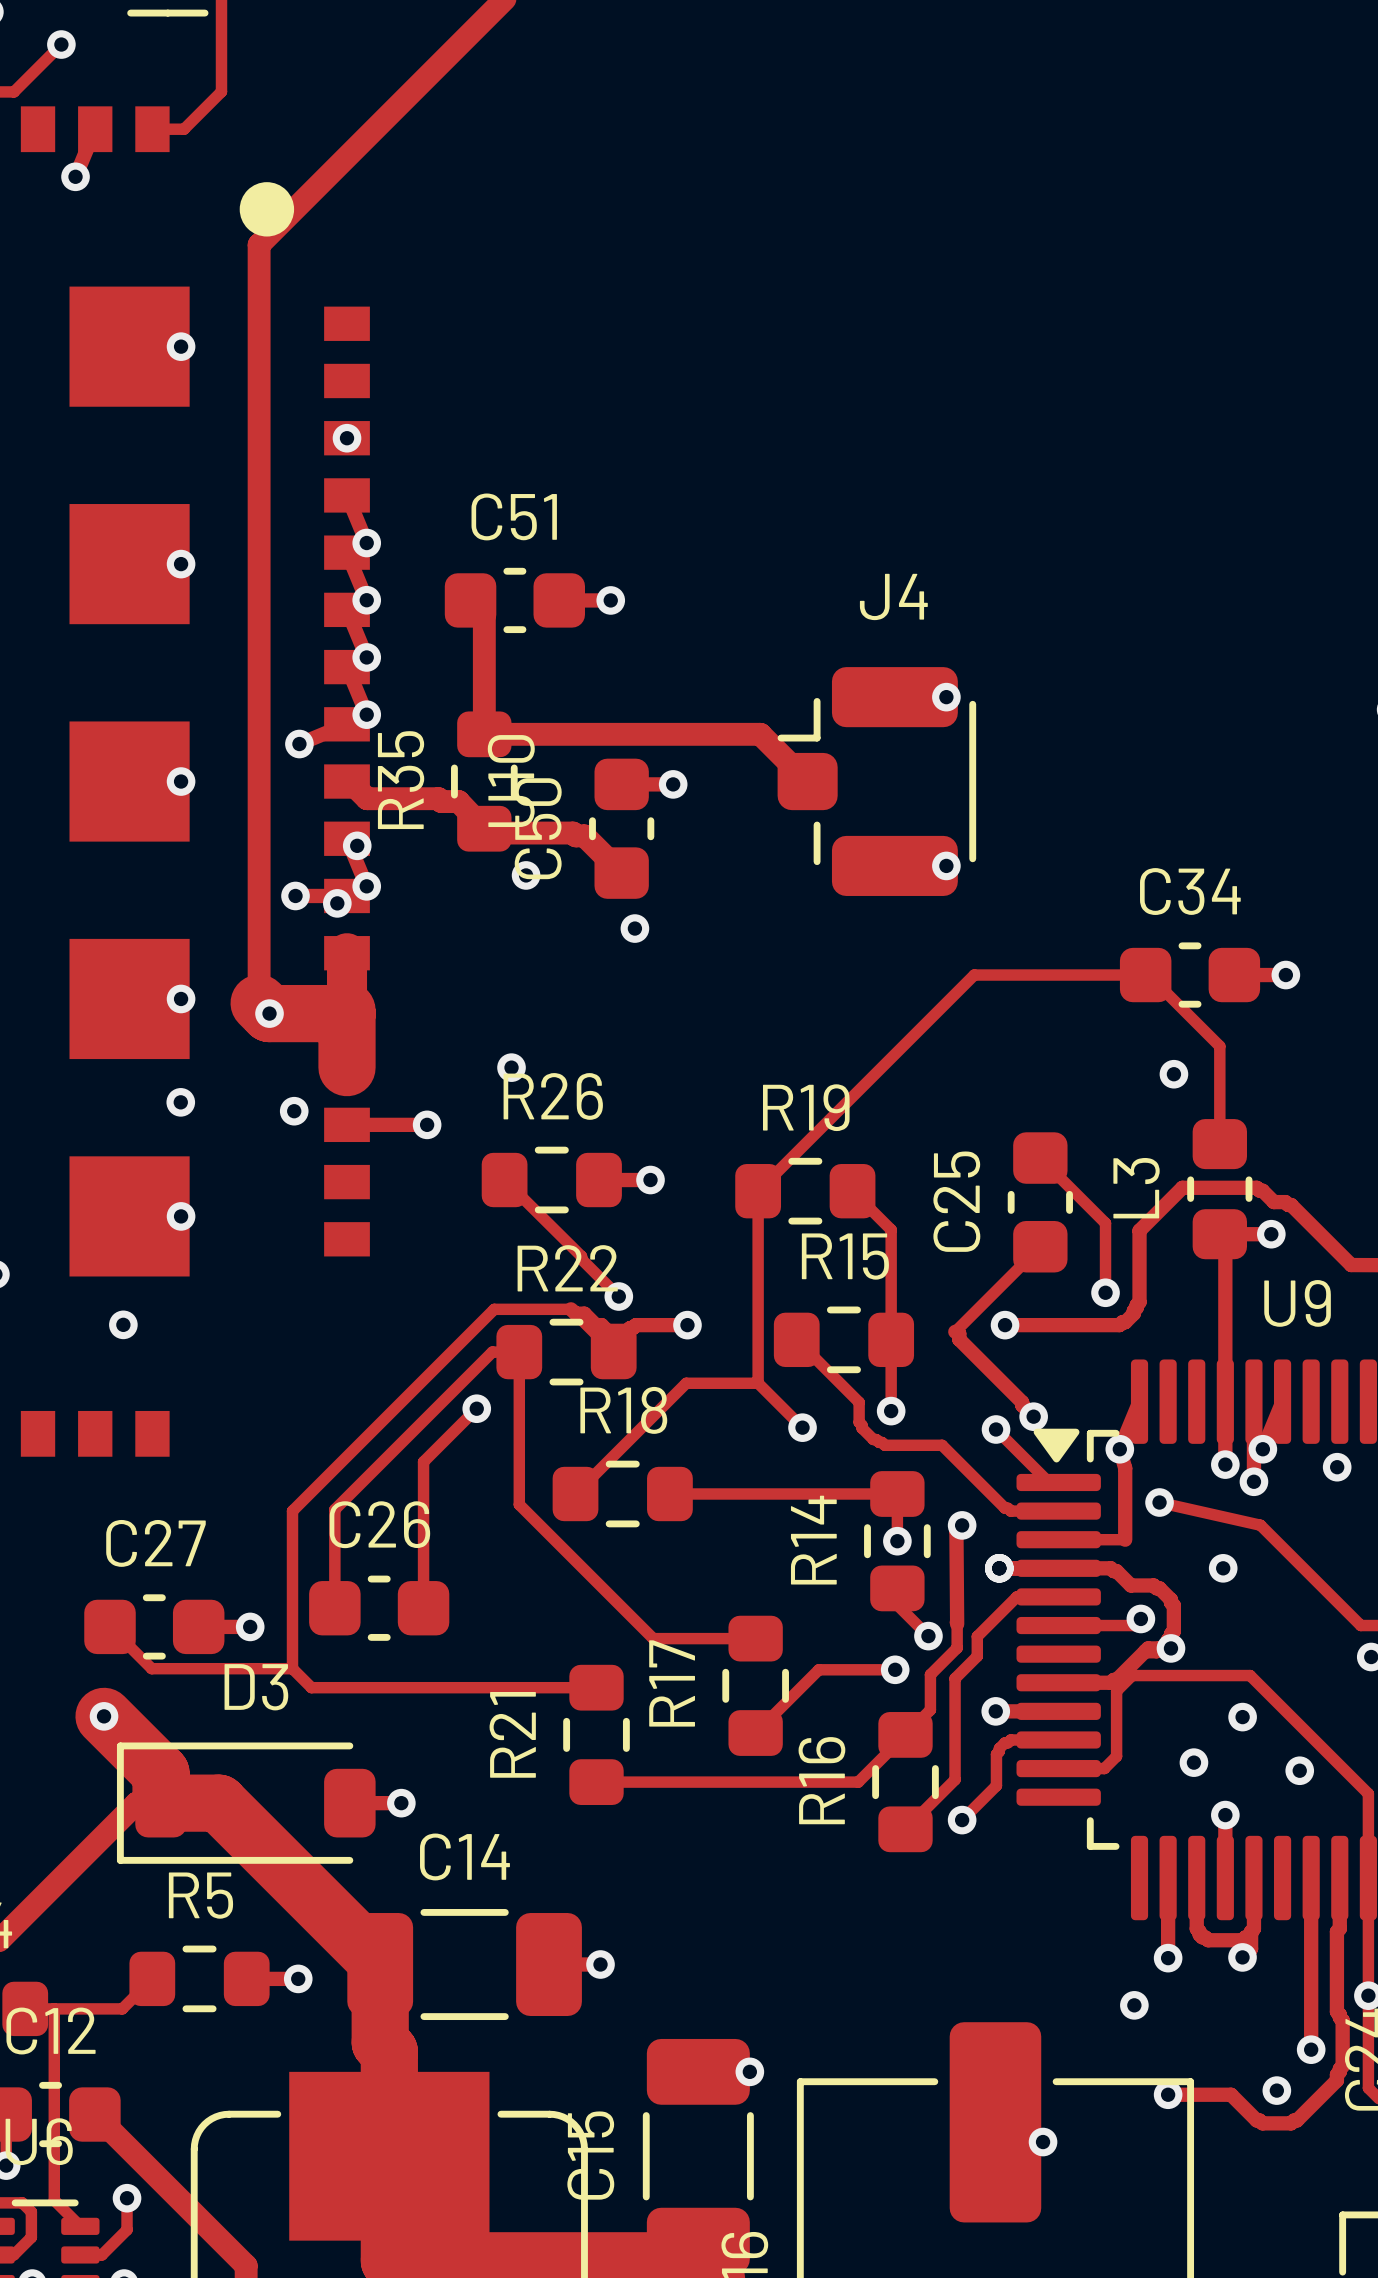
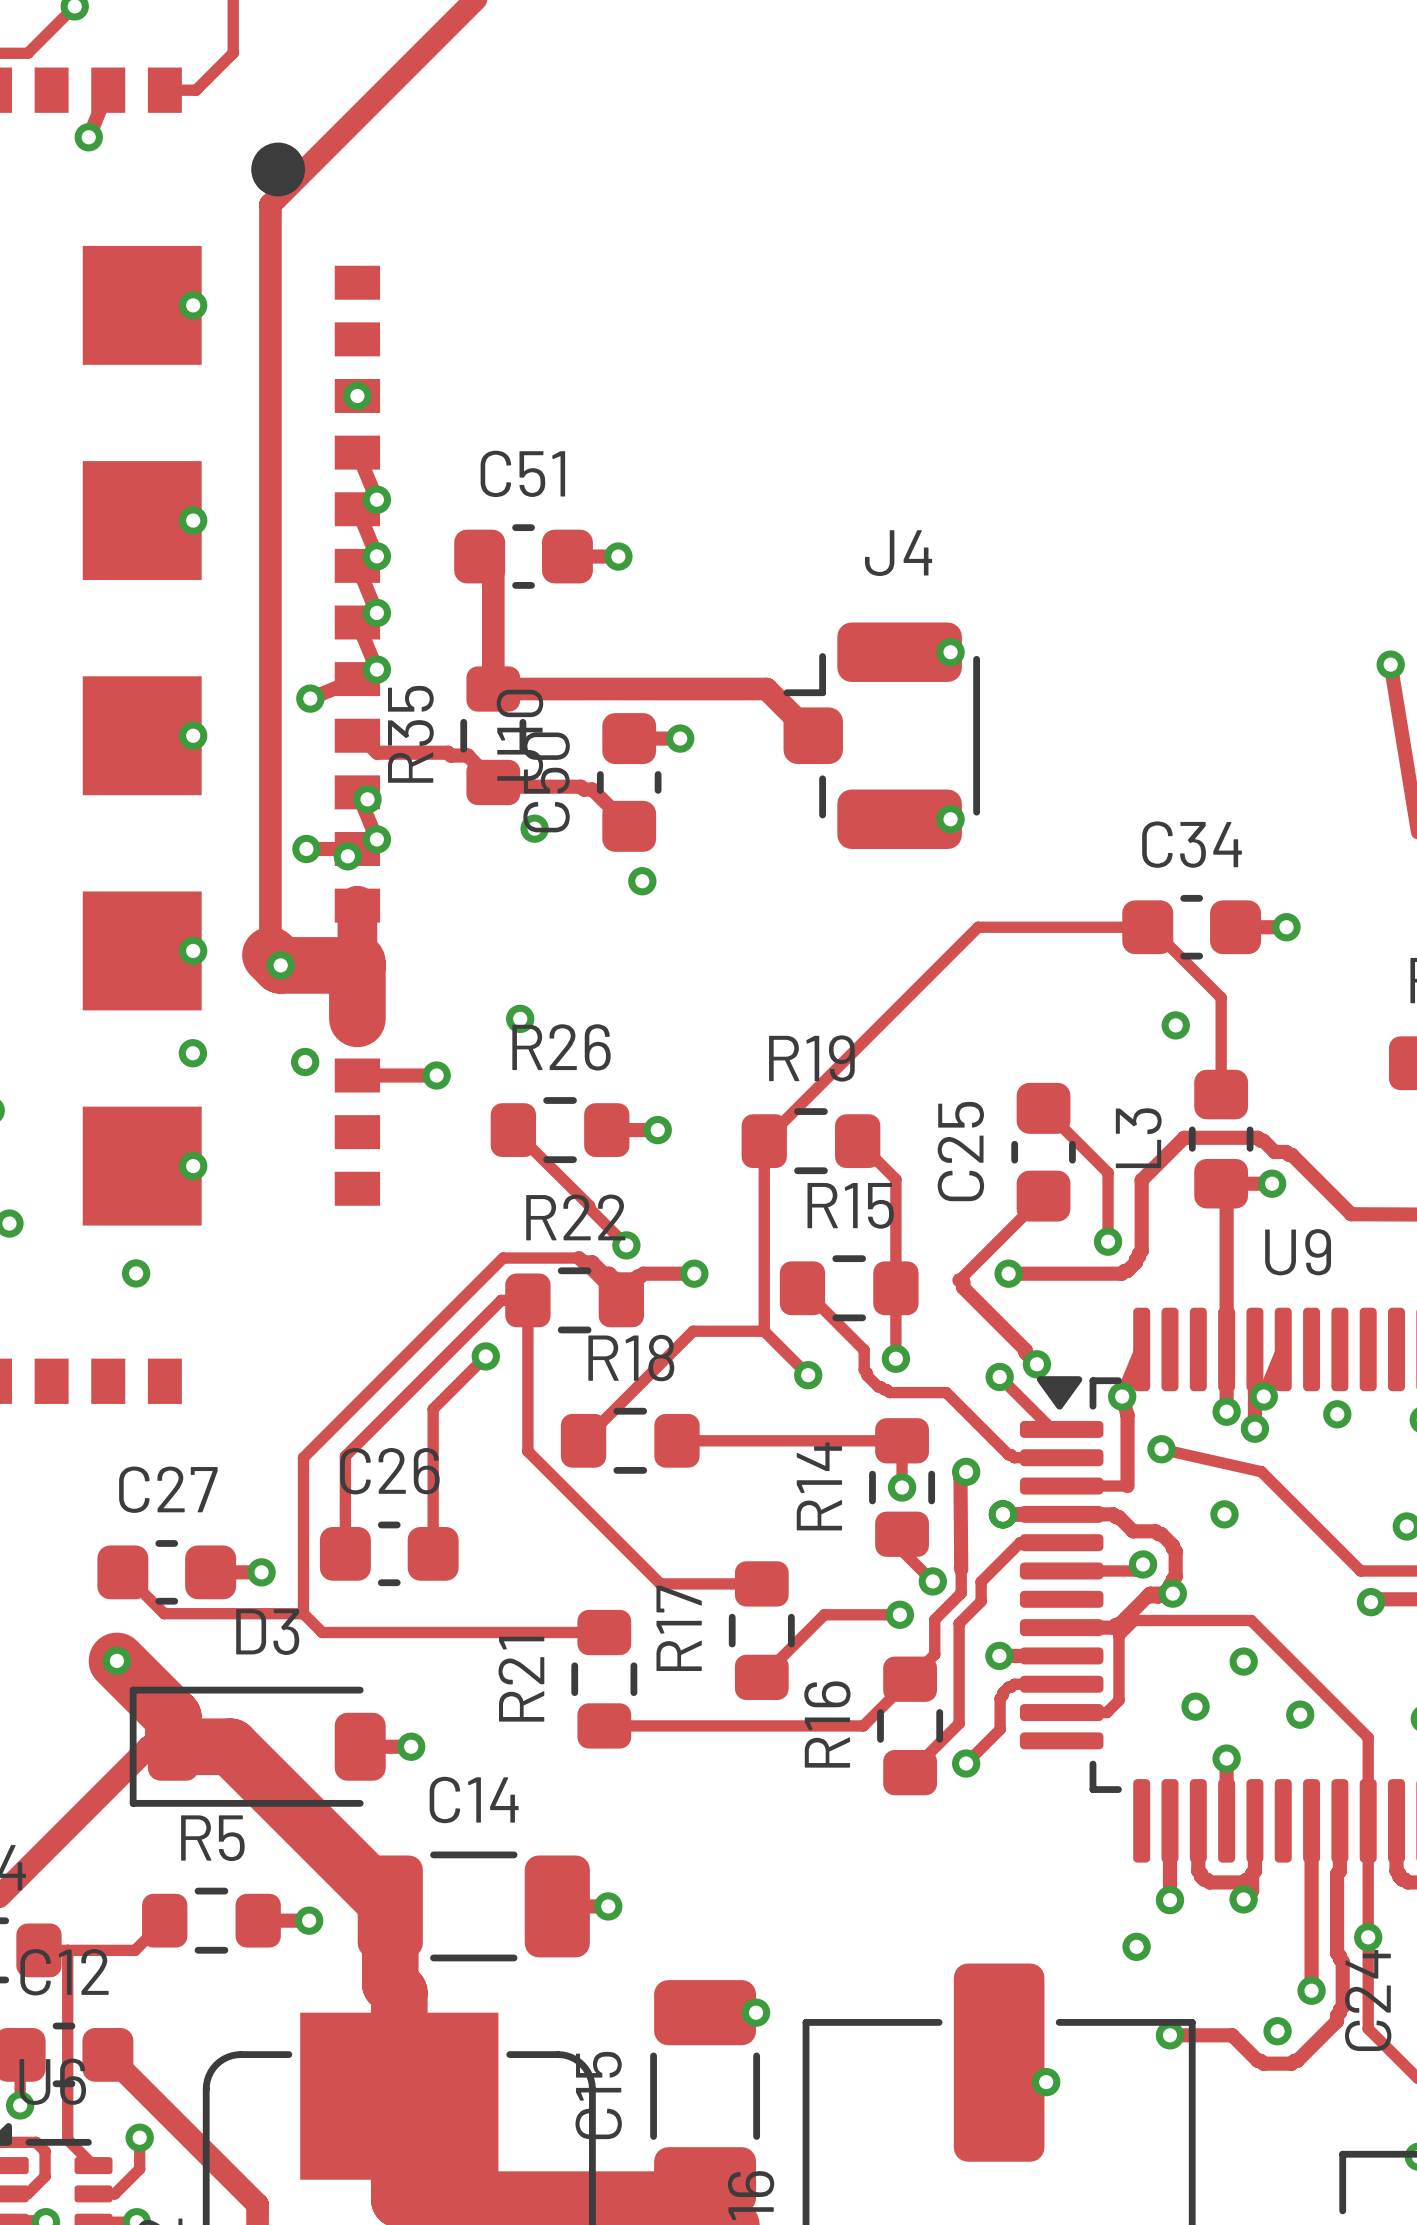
track width: thick (347, 781) (349, 781) (367, 798) (438, 798) (441, 801) (458, 801) (484, 828) (487, 827) (492, 833) (573, 833) (575, 835) (584, 835) (621, 873) -> thin (357, 735) (360, 735) (377, 752) (448, 752) (450, 755) (467, 755) (493, 782) (496, 781) (501, 786) (581, 786) (583, 789) (592, 789) (629, 826)

